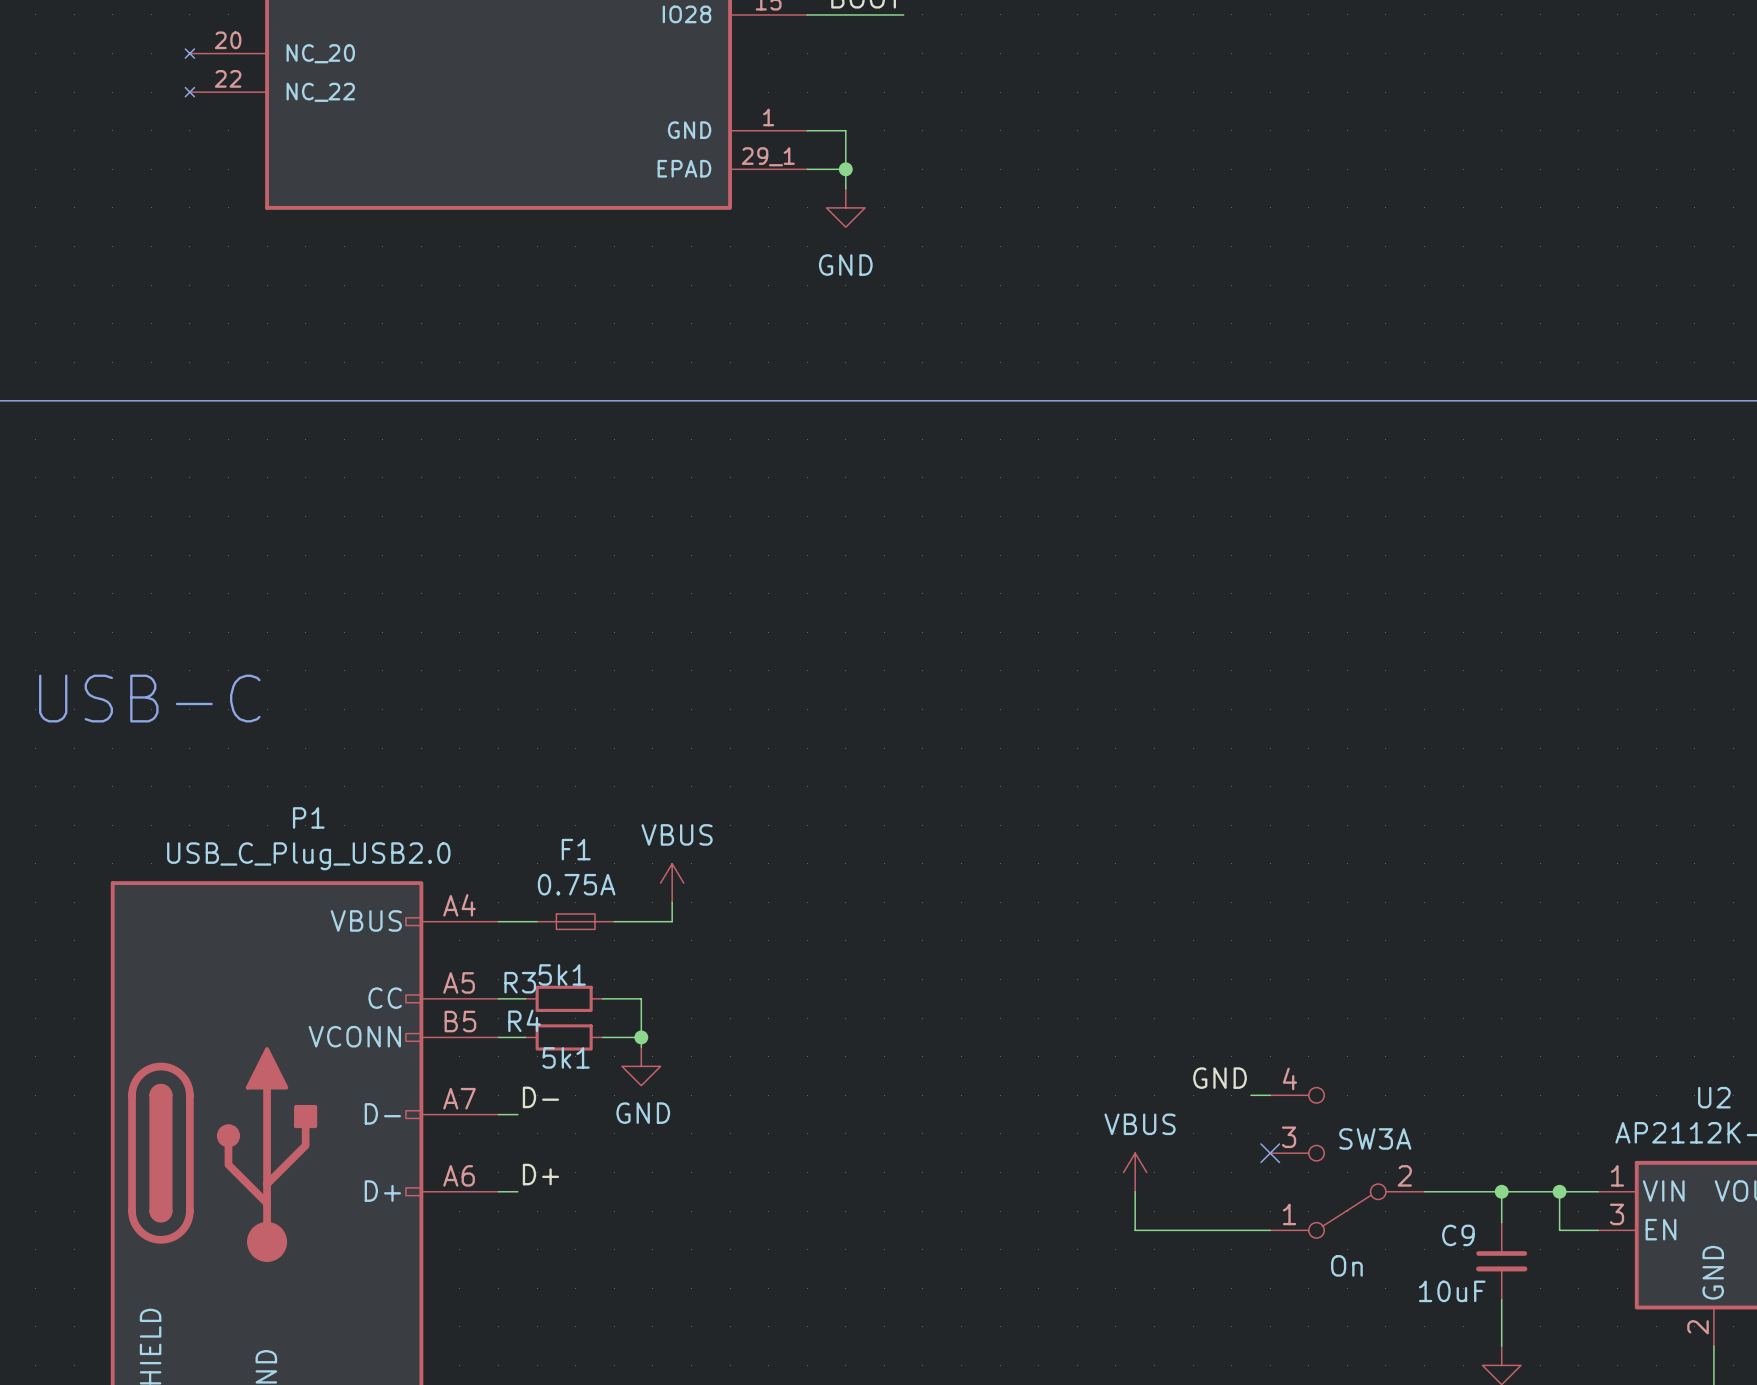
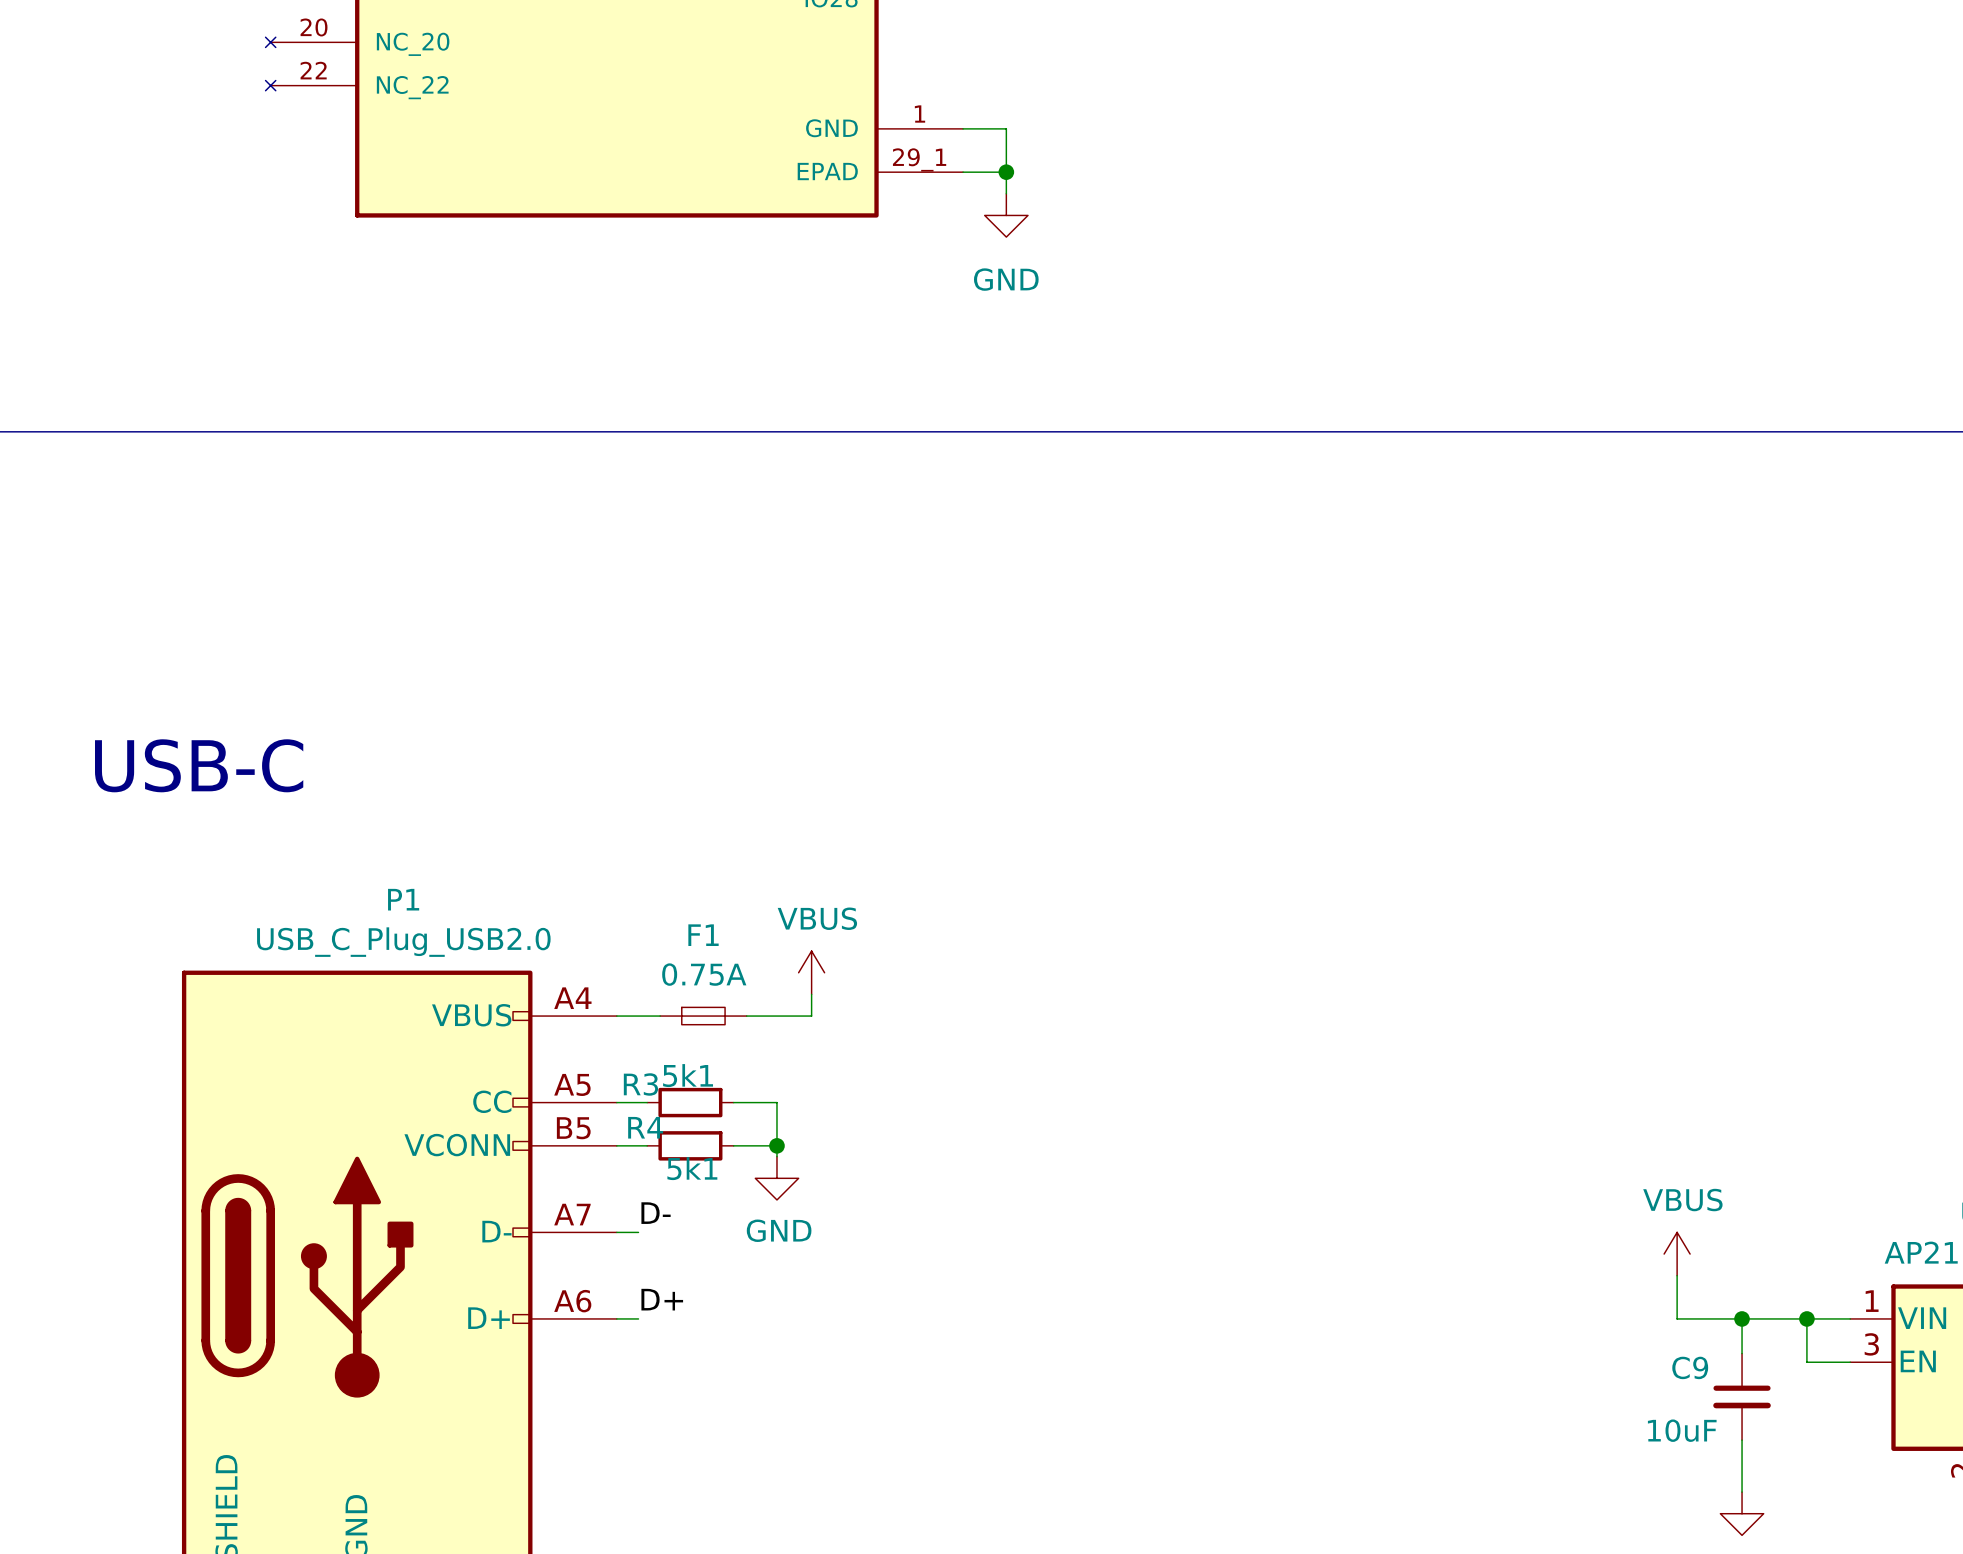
label: GND (1220, 1078) -> none
wire: (1250, 1095) (1270, 1095) -> none
no-connect mark: (1270, 1153) -> none
SW3A: On (1347, 1162) -> none
power symbol position: VBUS (1135, 1172) -> VBUS (1677, 1254)
wire: (1135, 1191) (1135, 1230) (1270, 1230) -> none
wire: (1424, 1191) (1443, 1191) -> (1677, 1275) (1677, 1318)

